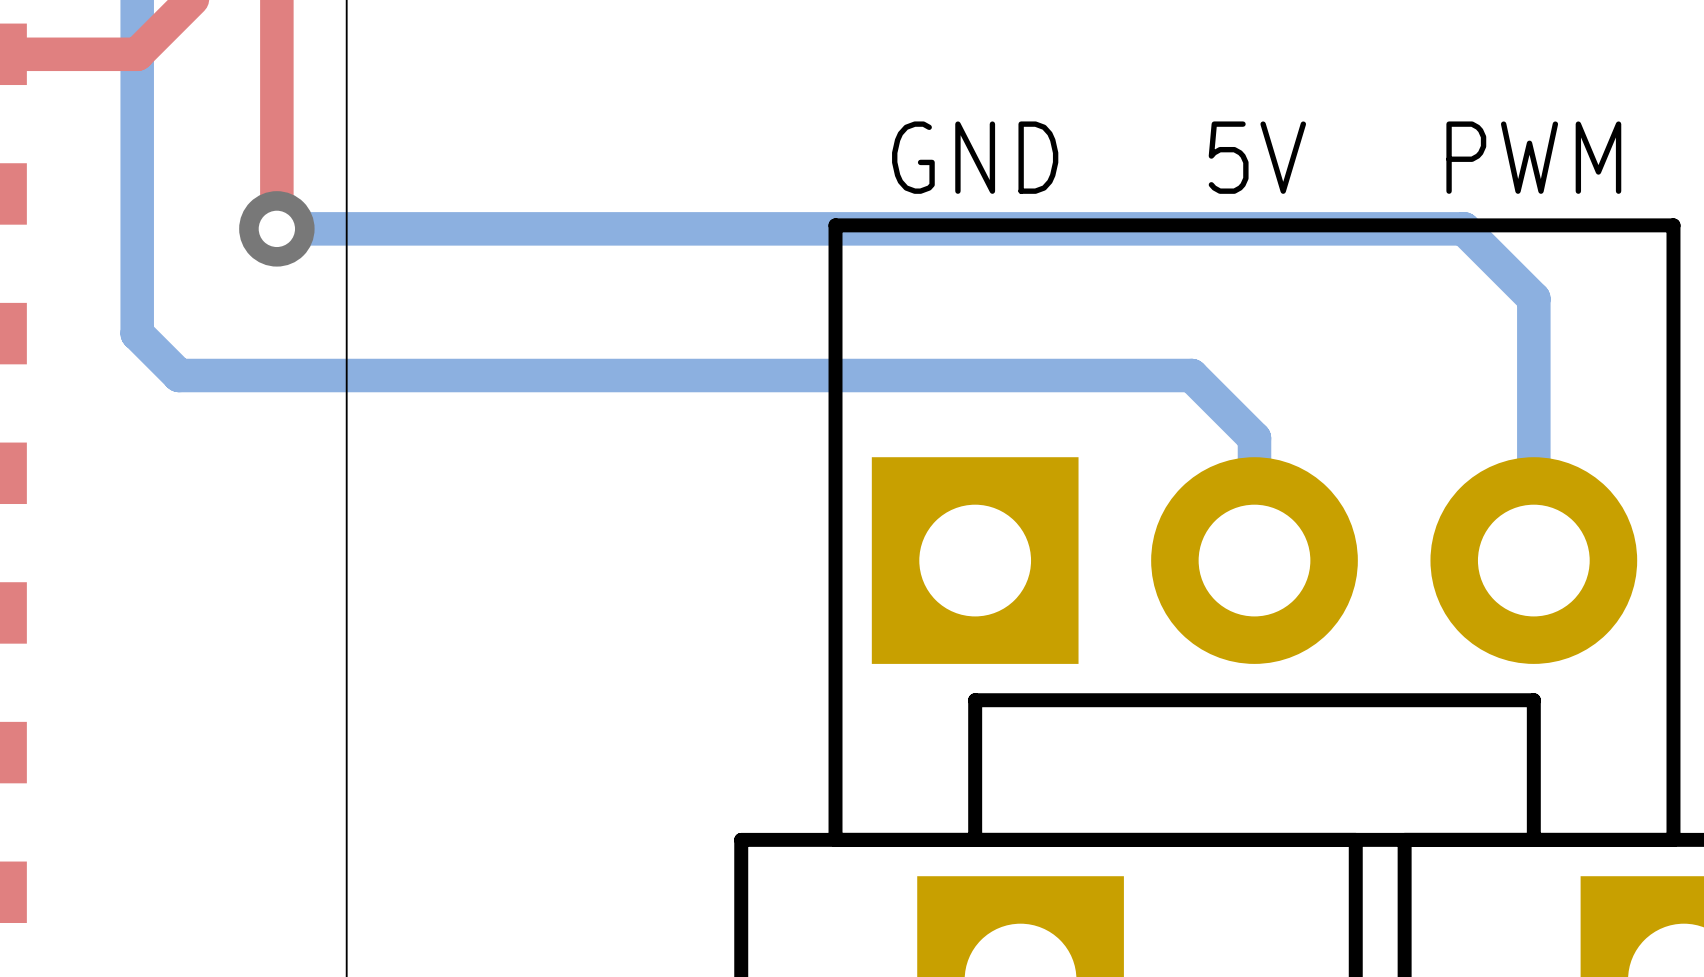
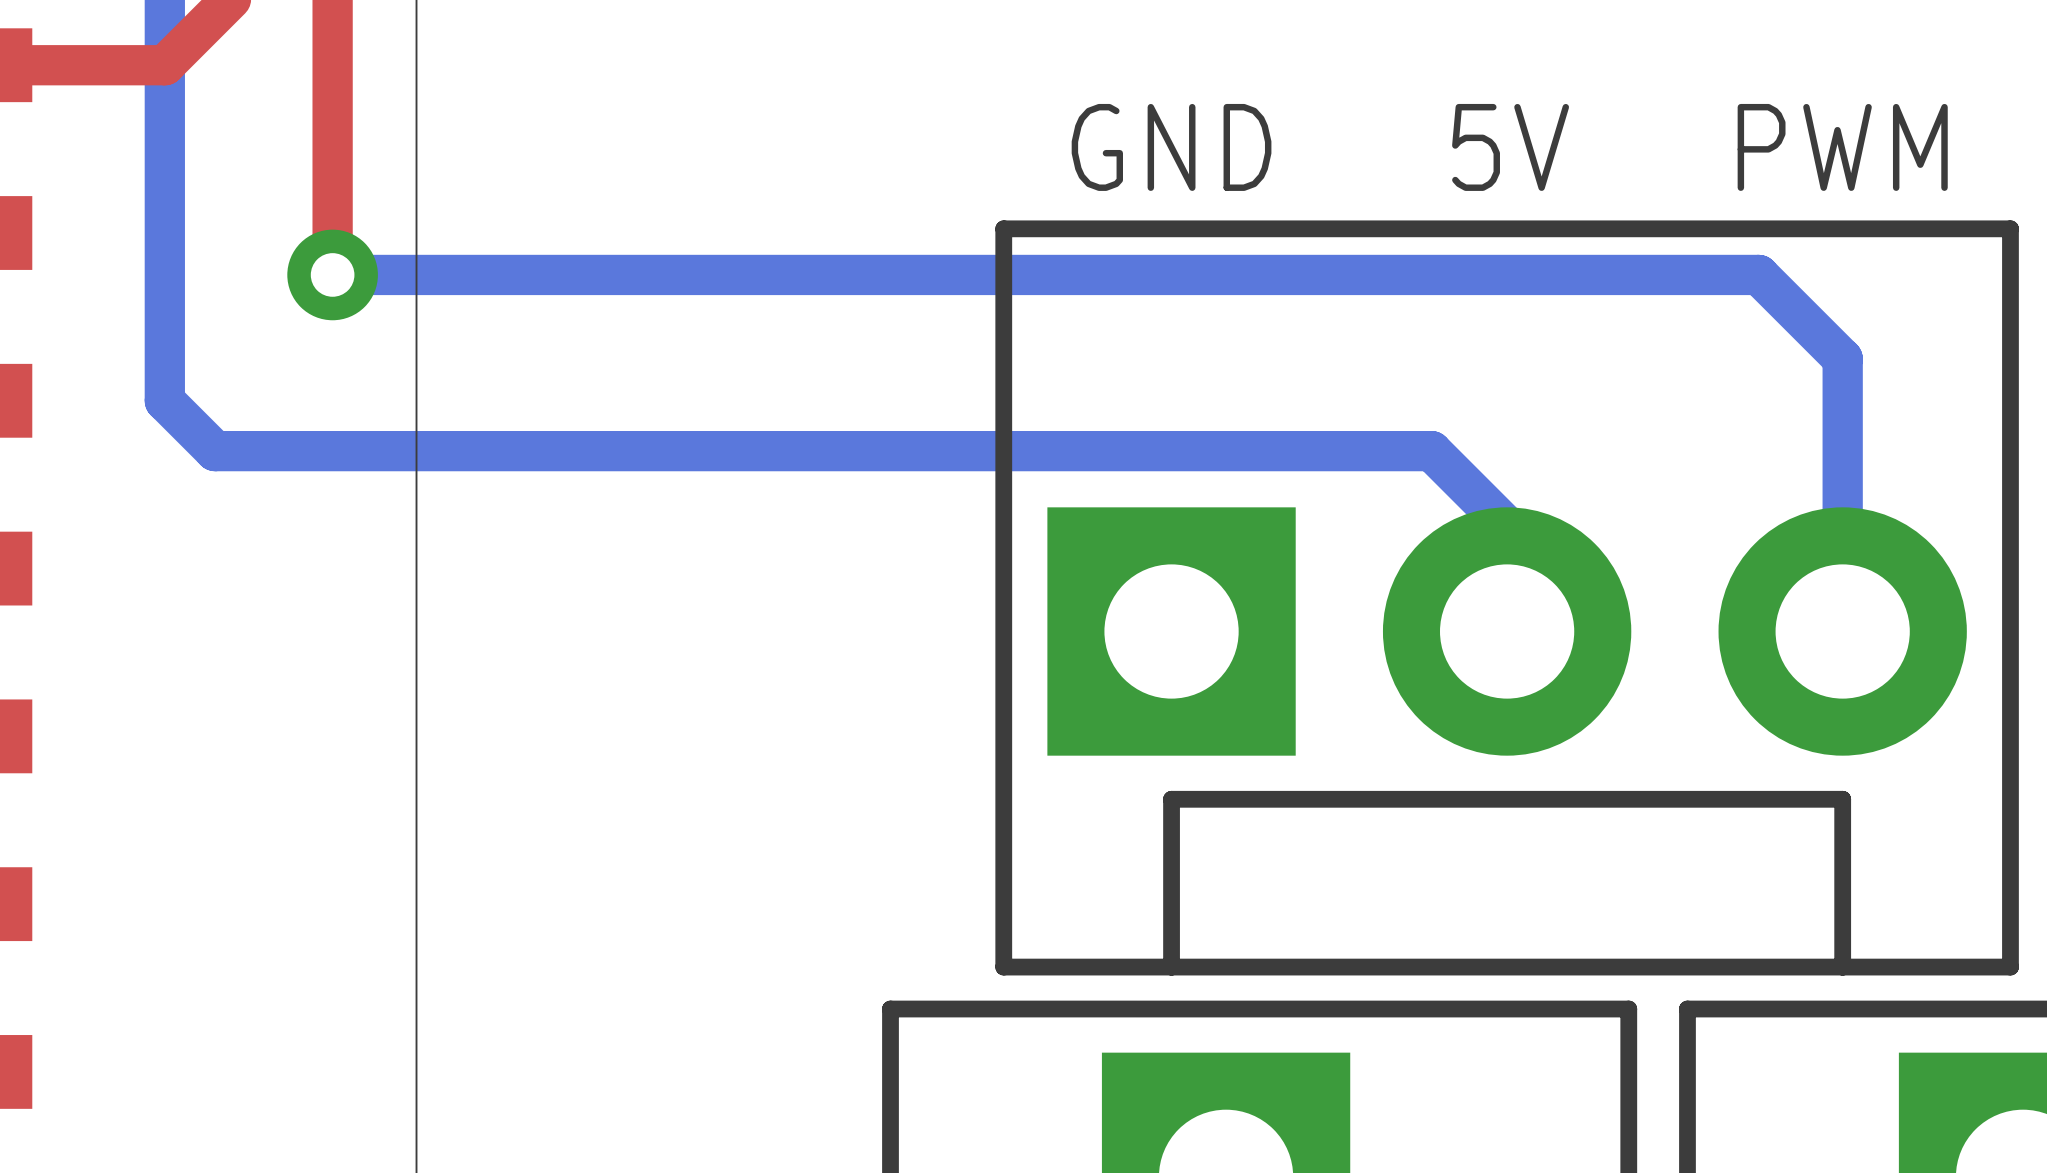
text position: GND (975, 157) -> GND (1171, 147)
text position: 5V (1257, 157) -> 5V (1510, 147)
text position: PWM (1533, 157) -> PWM (1842, 147)
part position: (1254, 532) -> (1507, 597)

